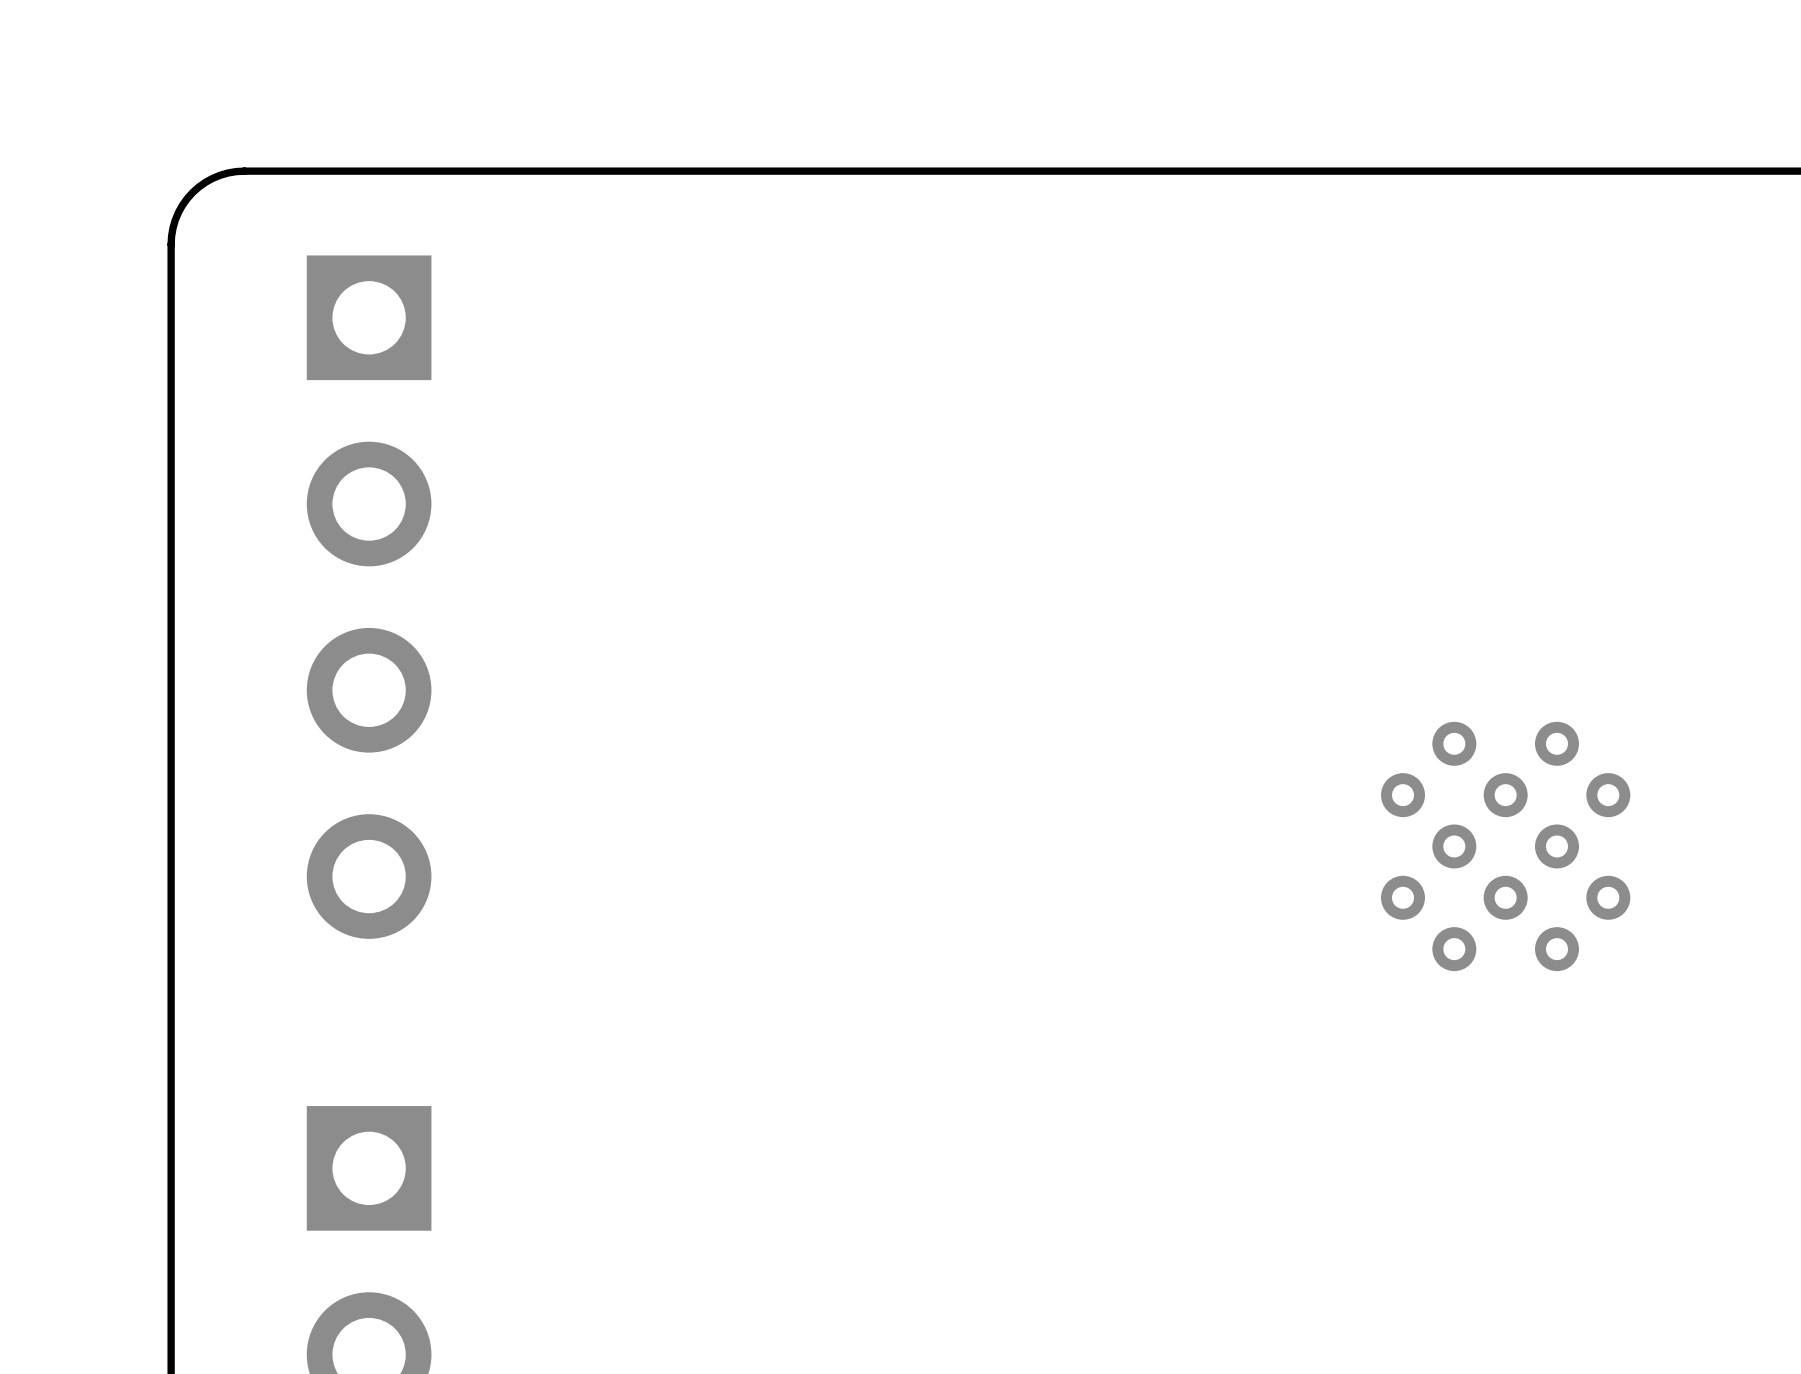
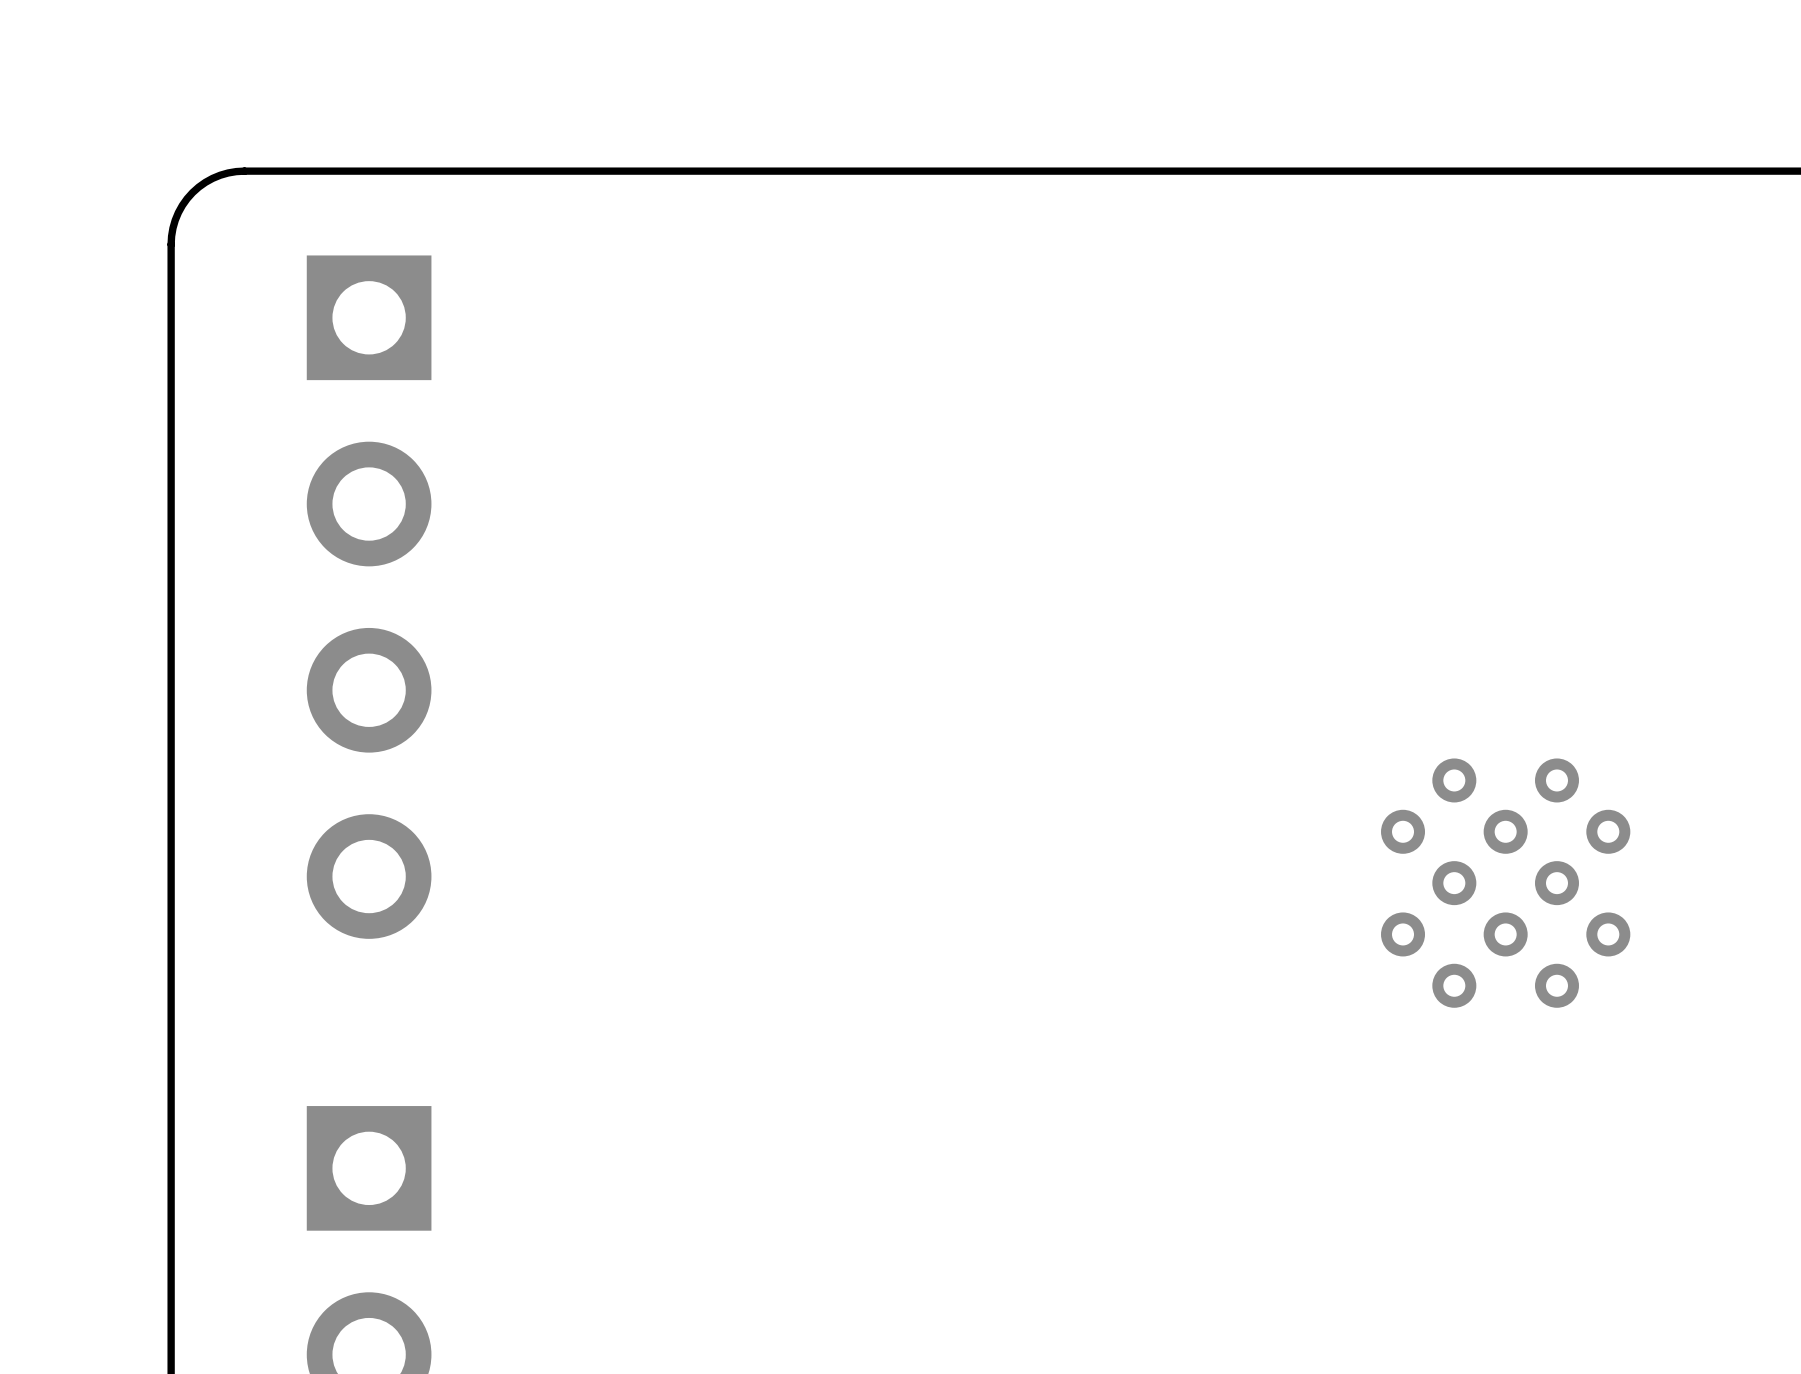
part position: (1505, 846) -> (1505, 883)

